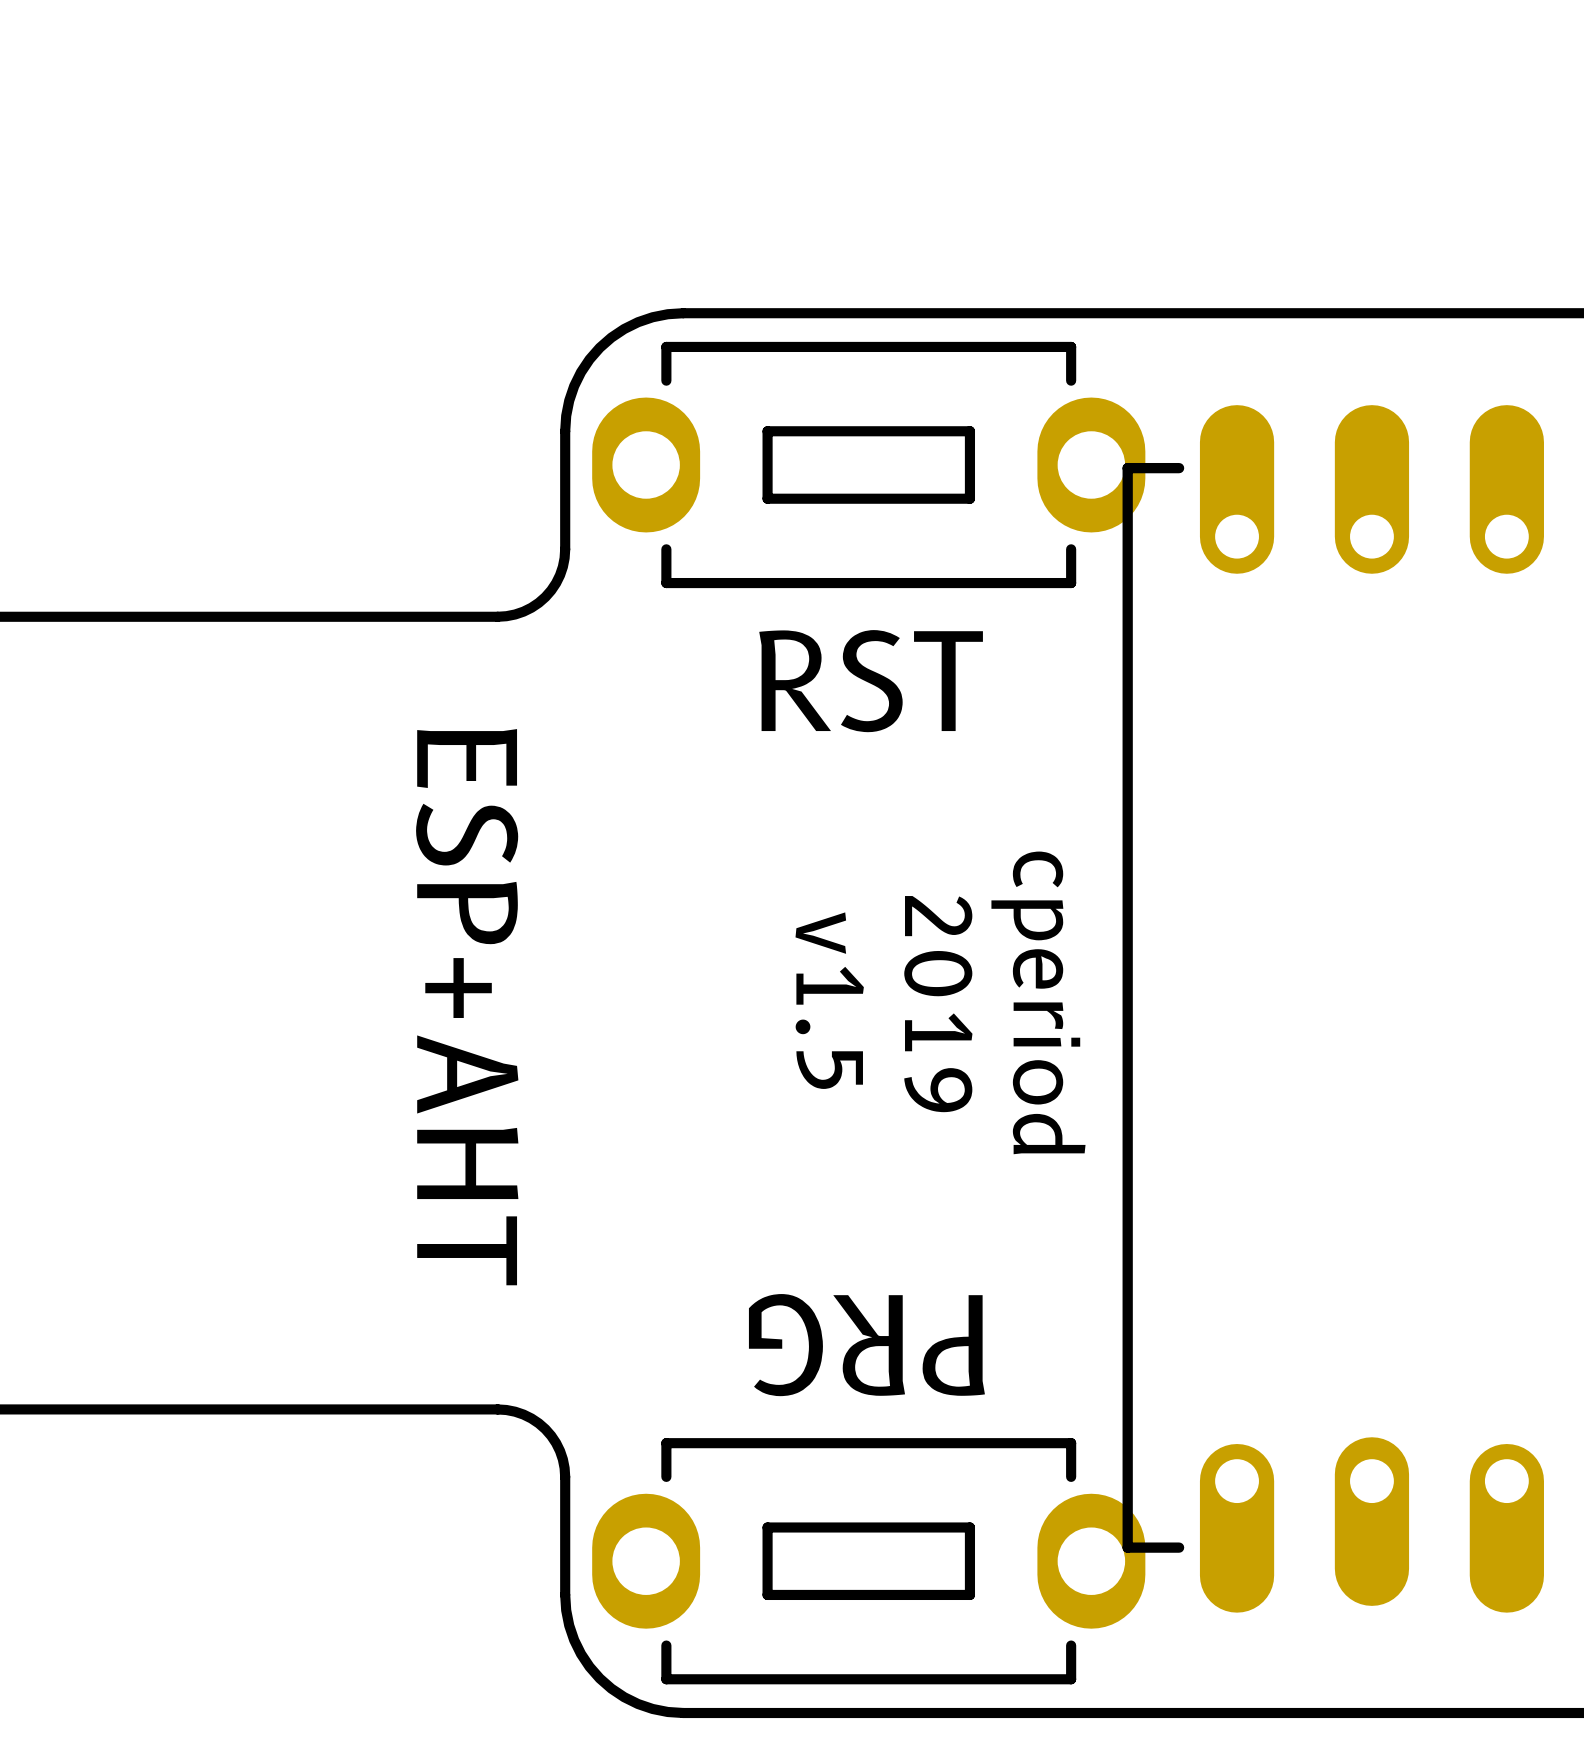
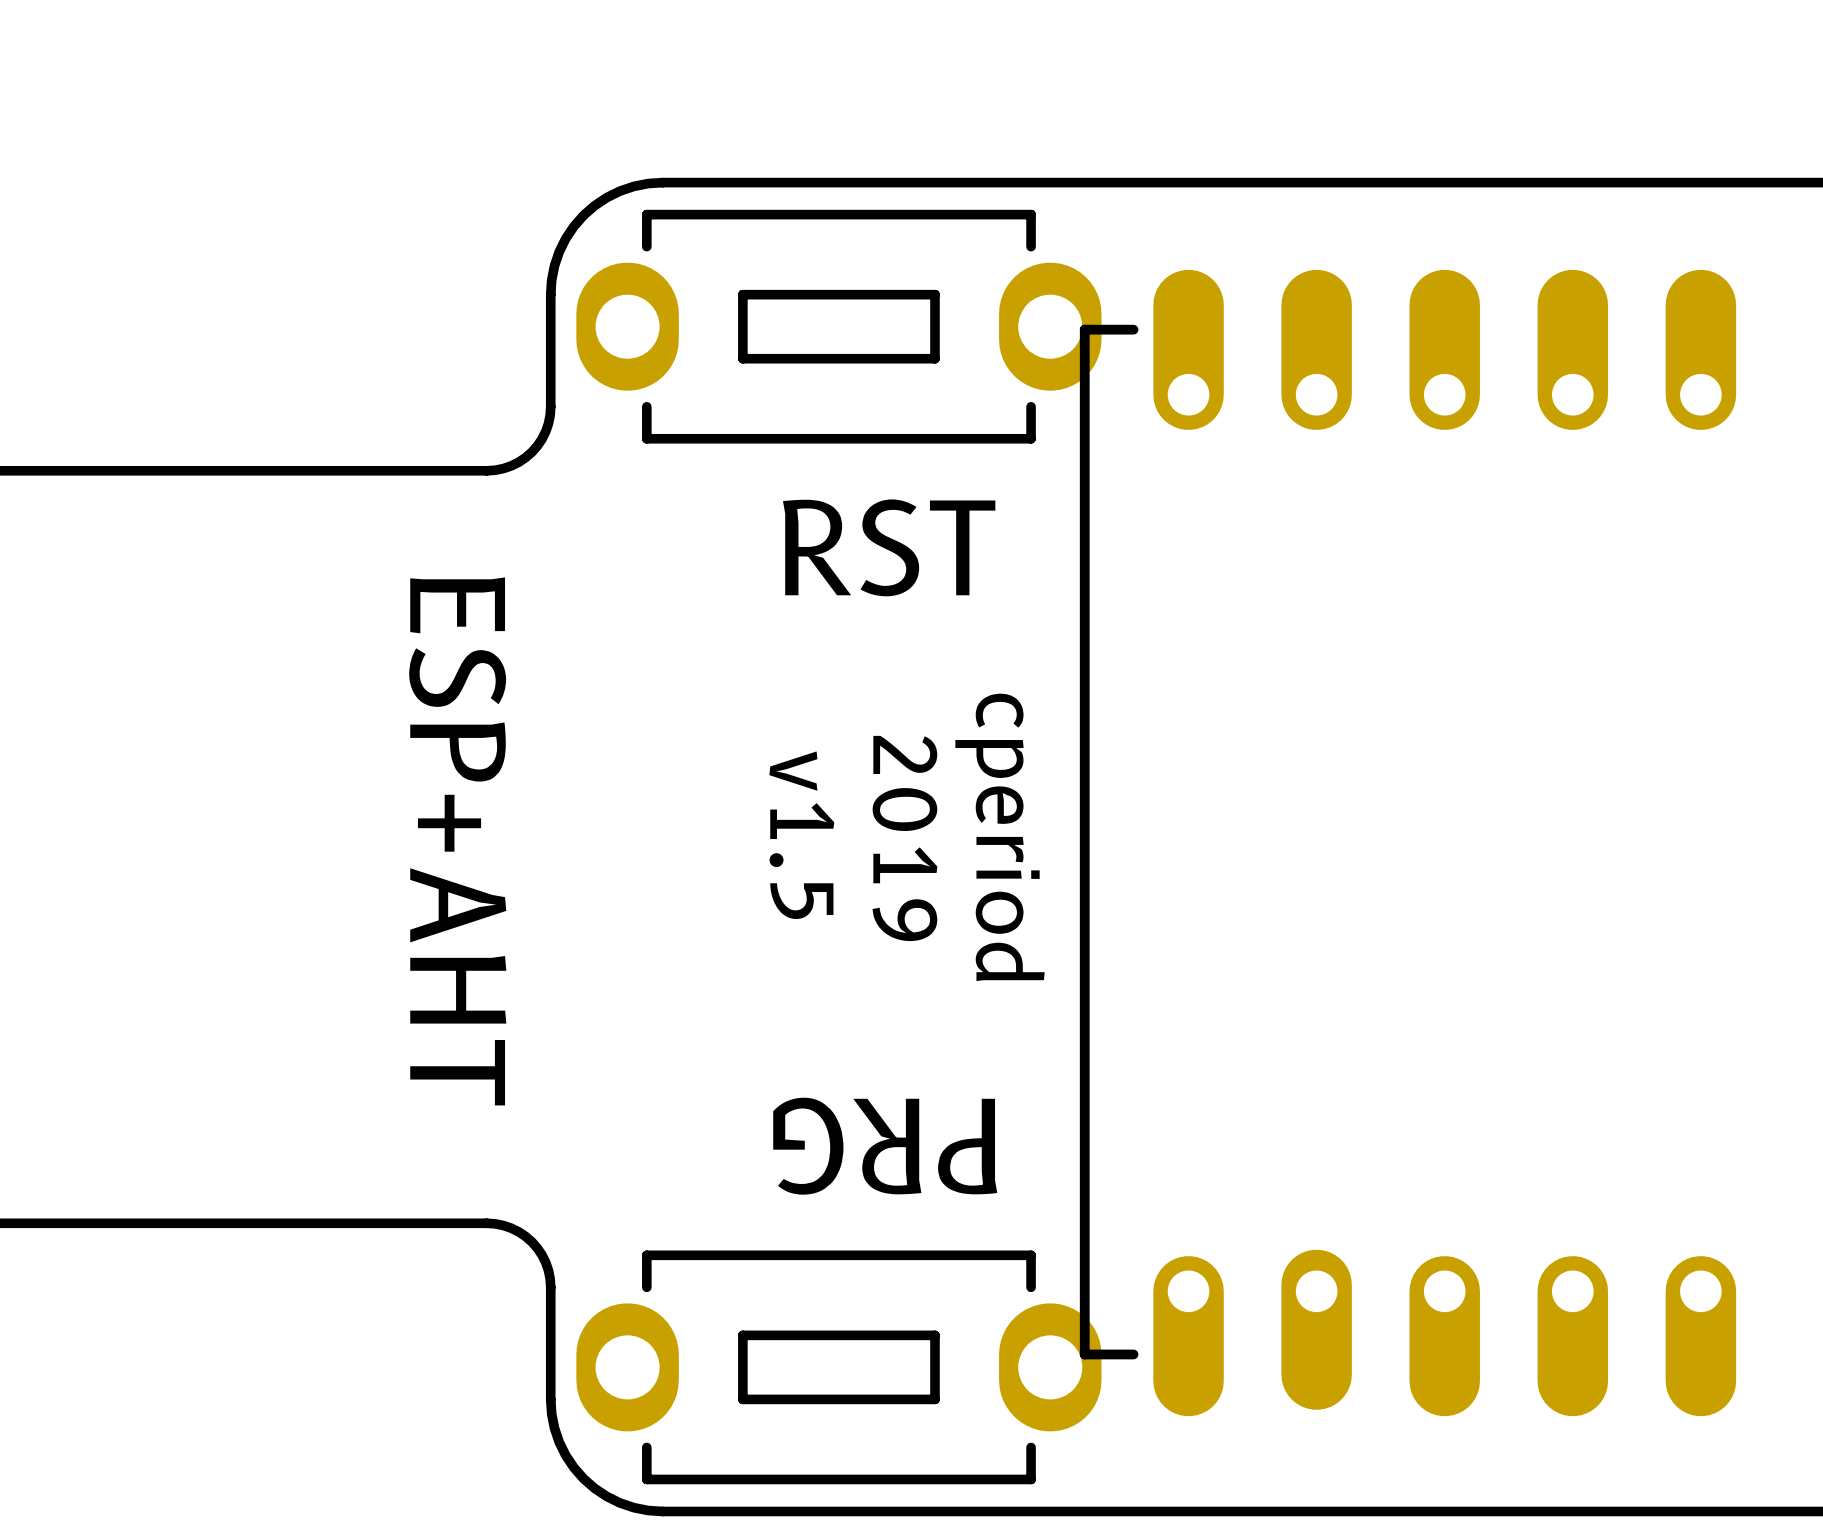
text position: RST (871, 681) -> RST (889, 547)
text position: PRG (866, 1345) -> PRG (885, 1146)

